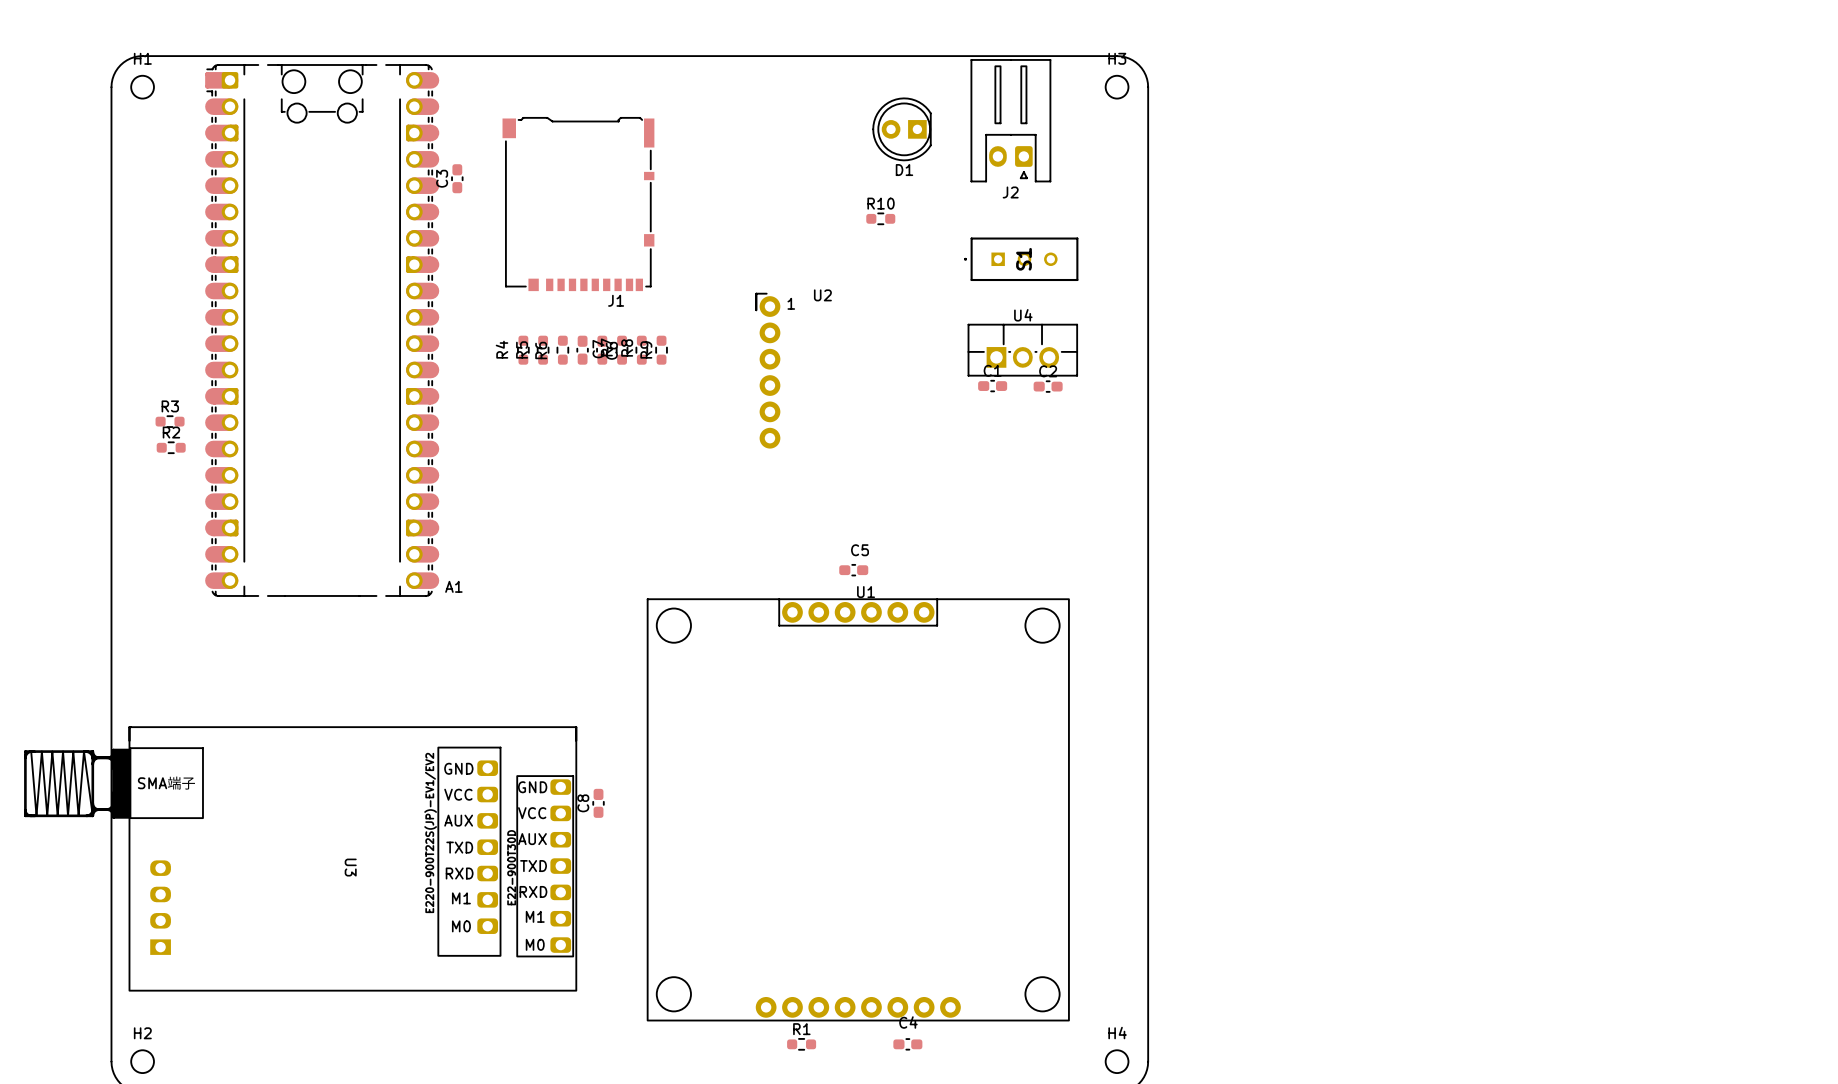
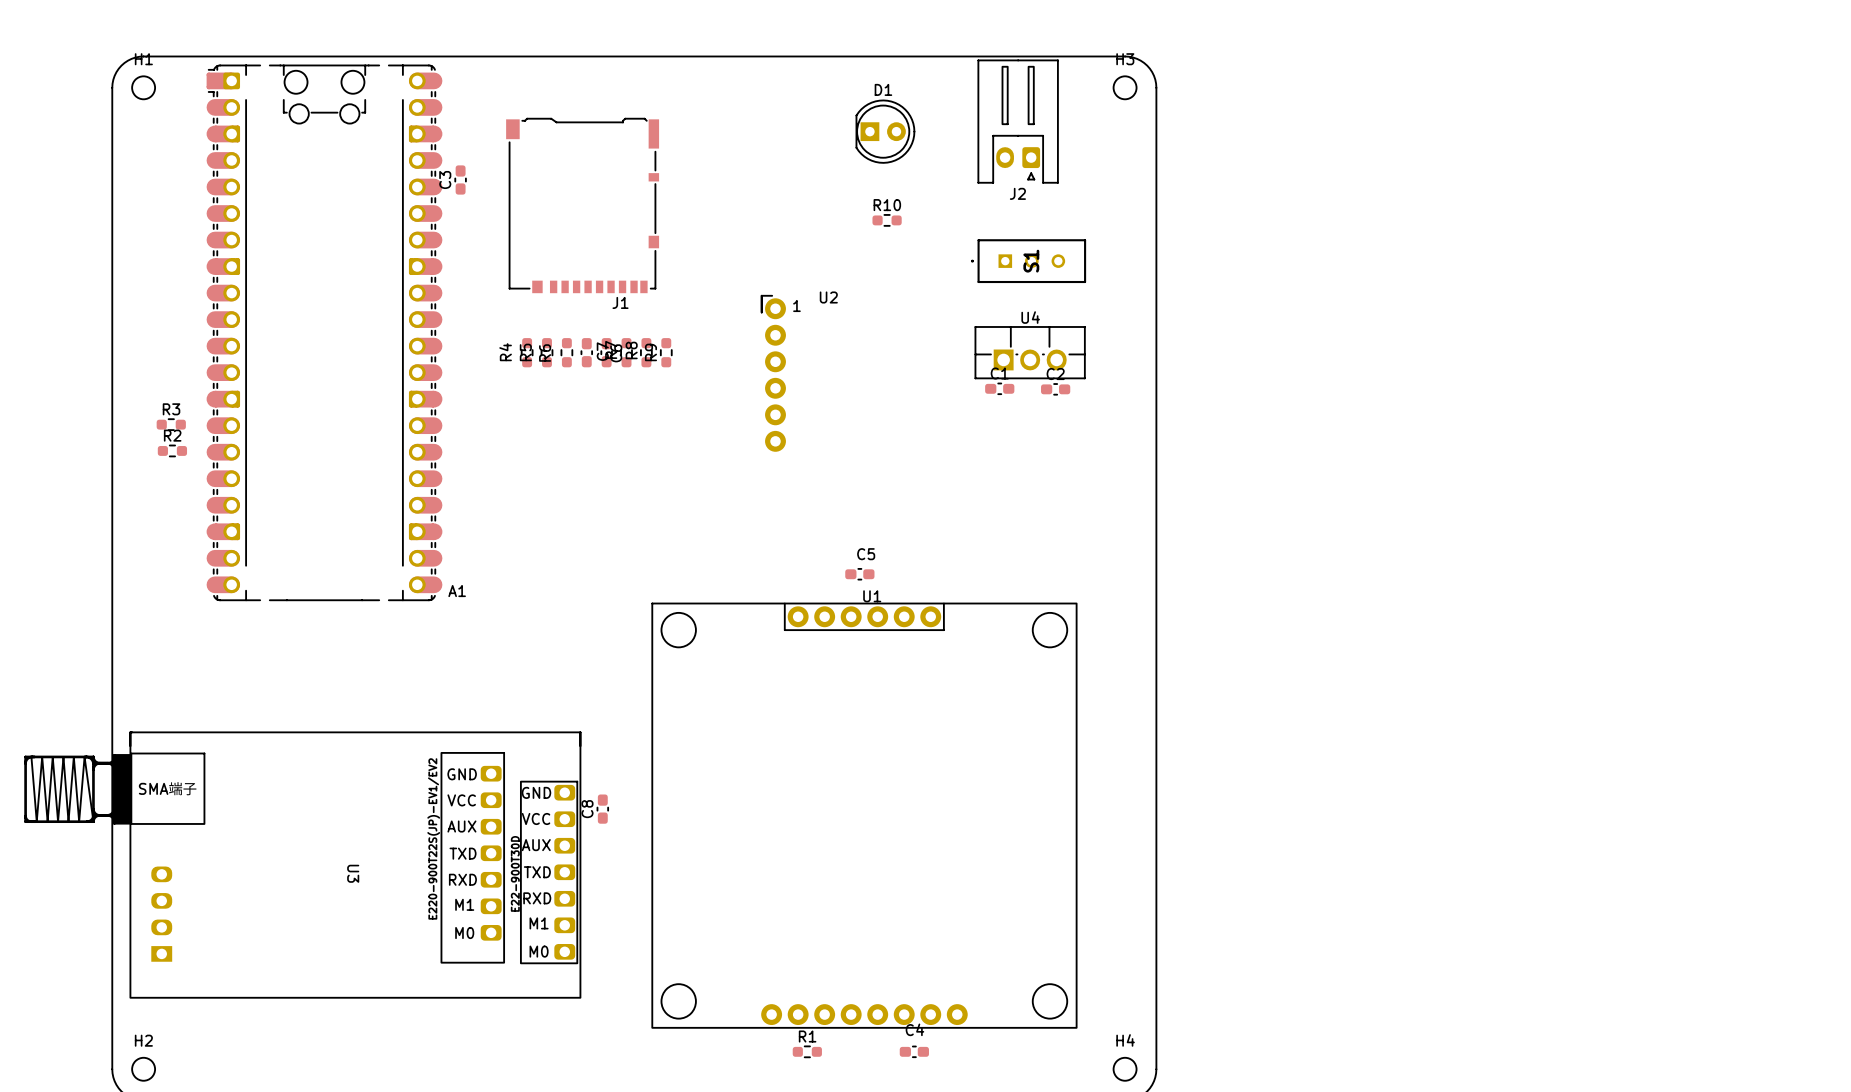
D1 rotation: 0° (902, 129) -> 180° (885, 131)

